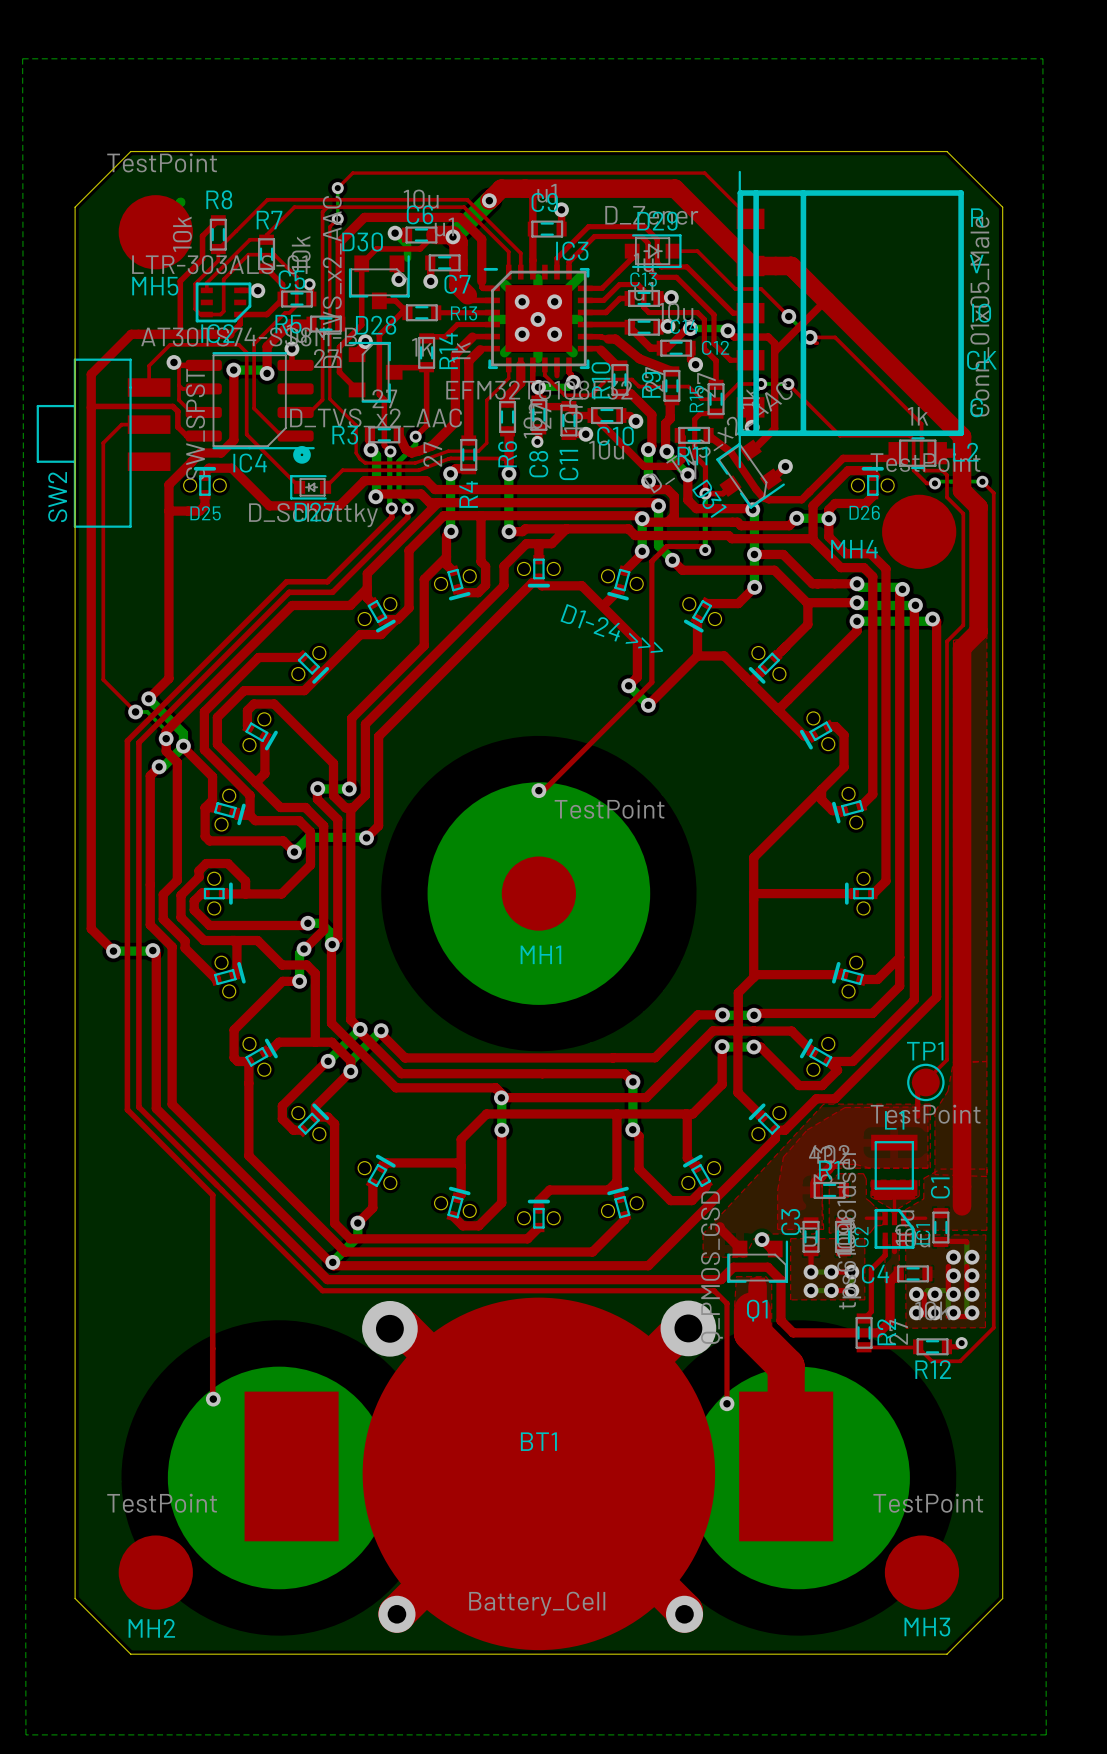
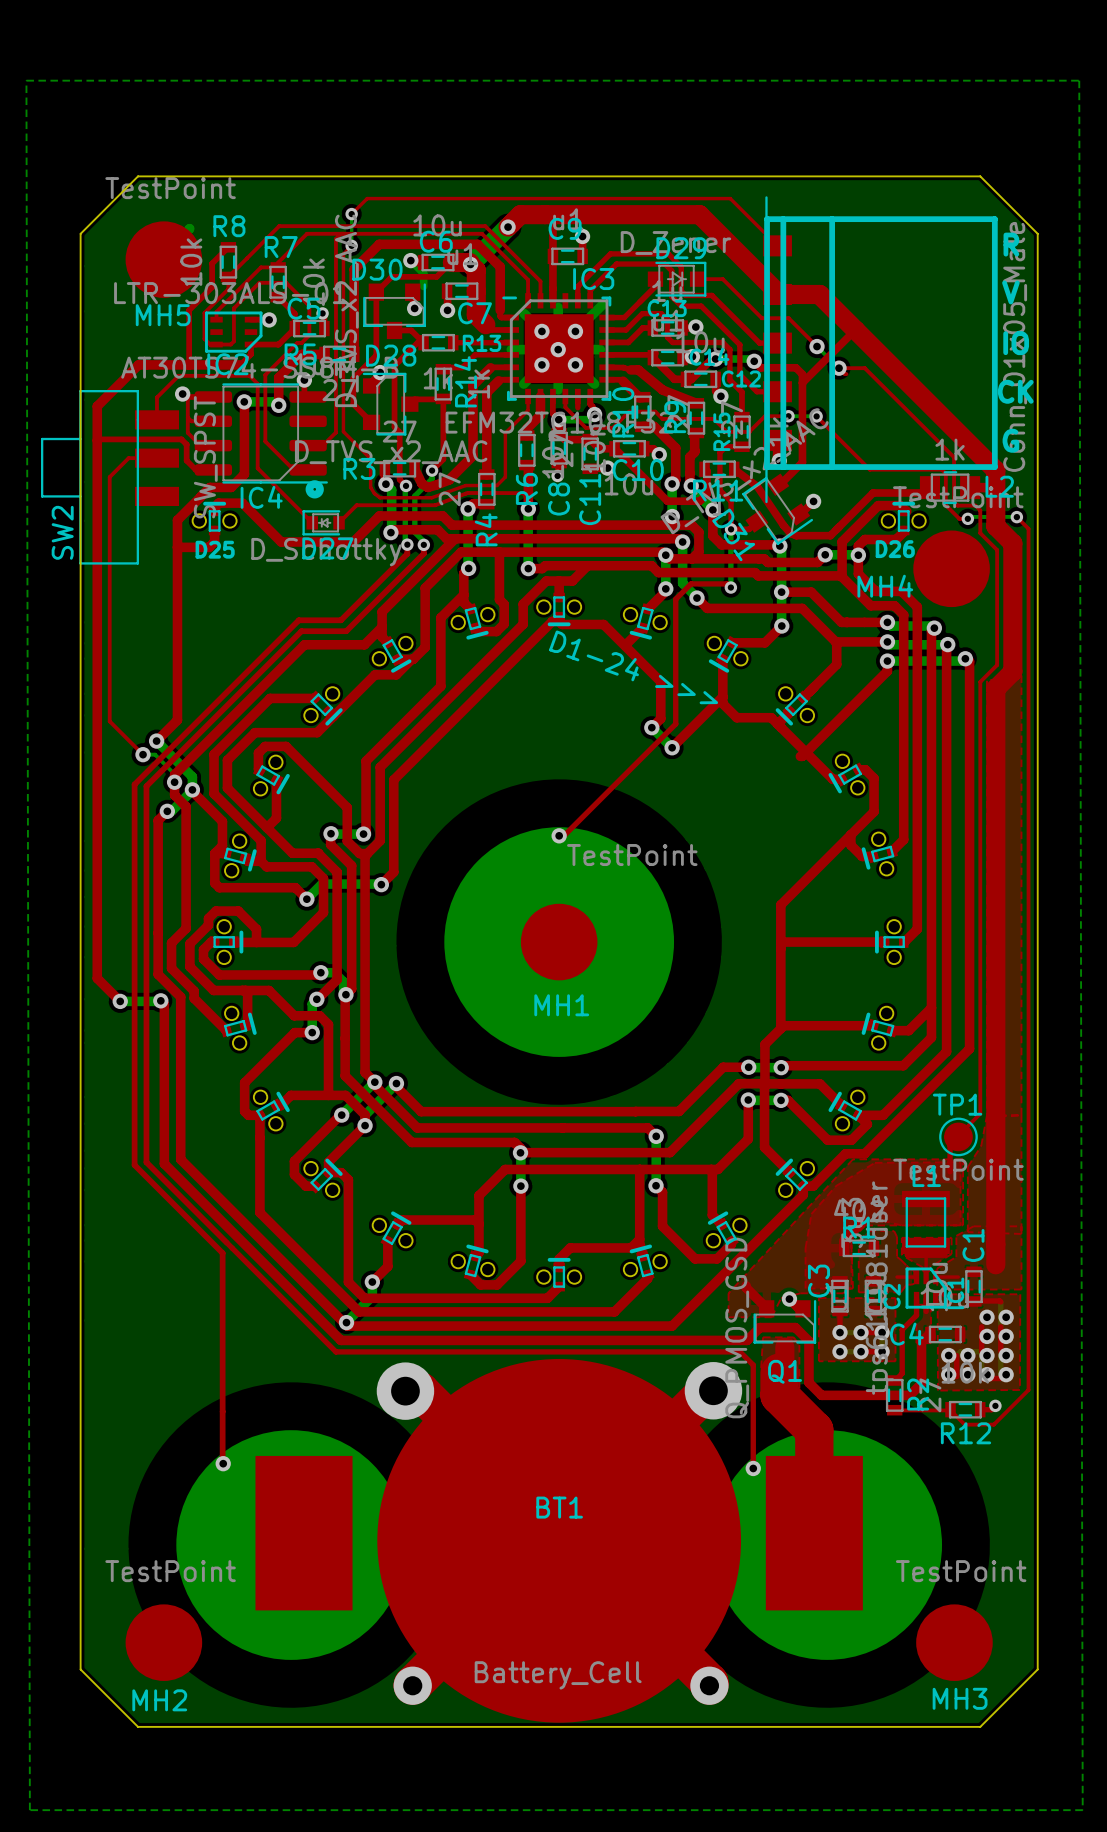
top track: (697, 655) (724, 655) (744, 676) -> (722, 696) (722, 703) (736, 717) (771, 717)
top track: none -> (806, 752) (800, 756)

